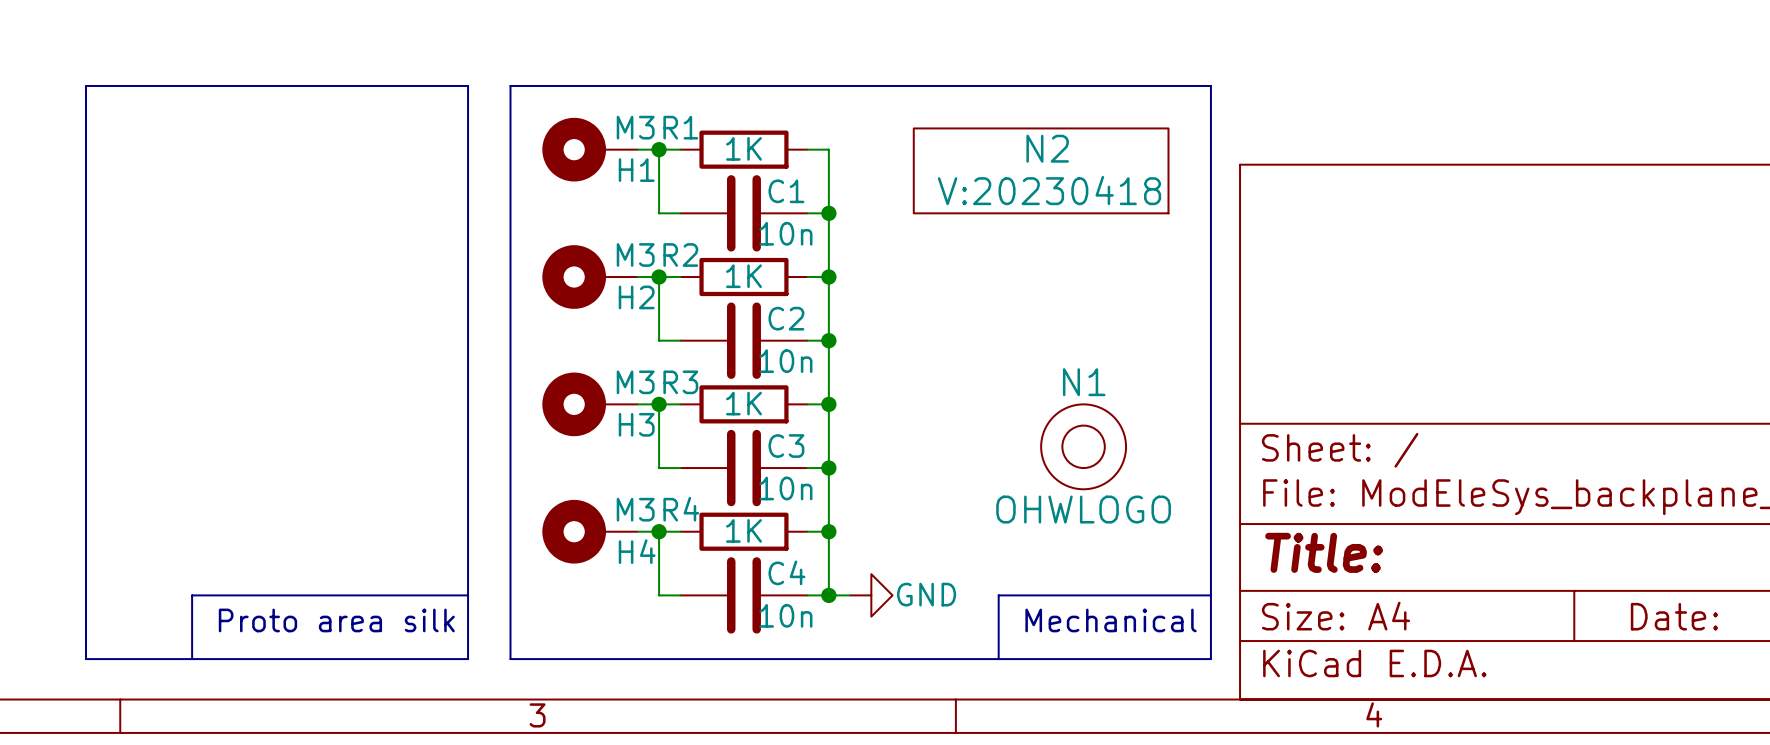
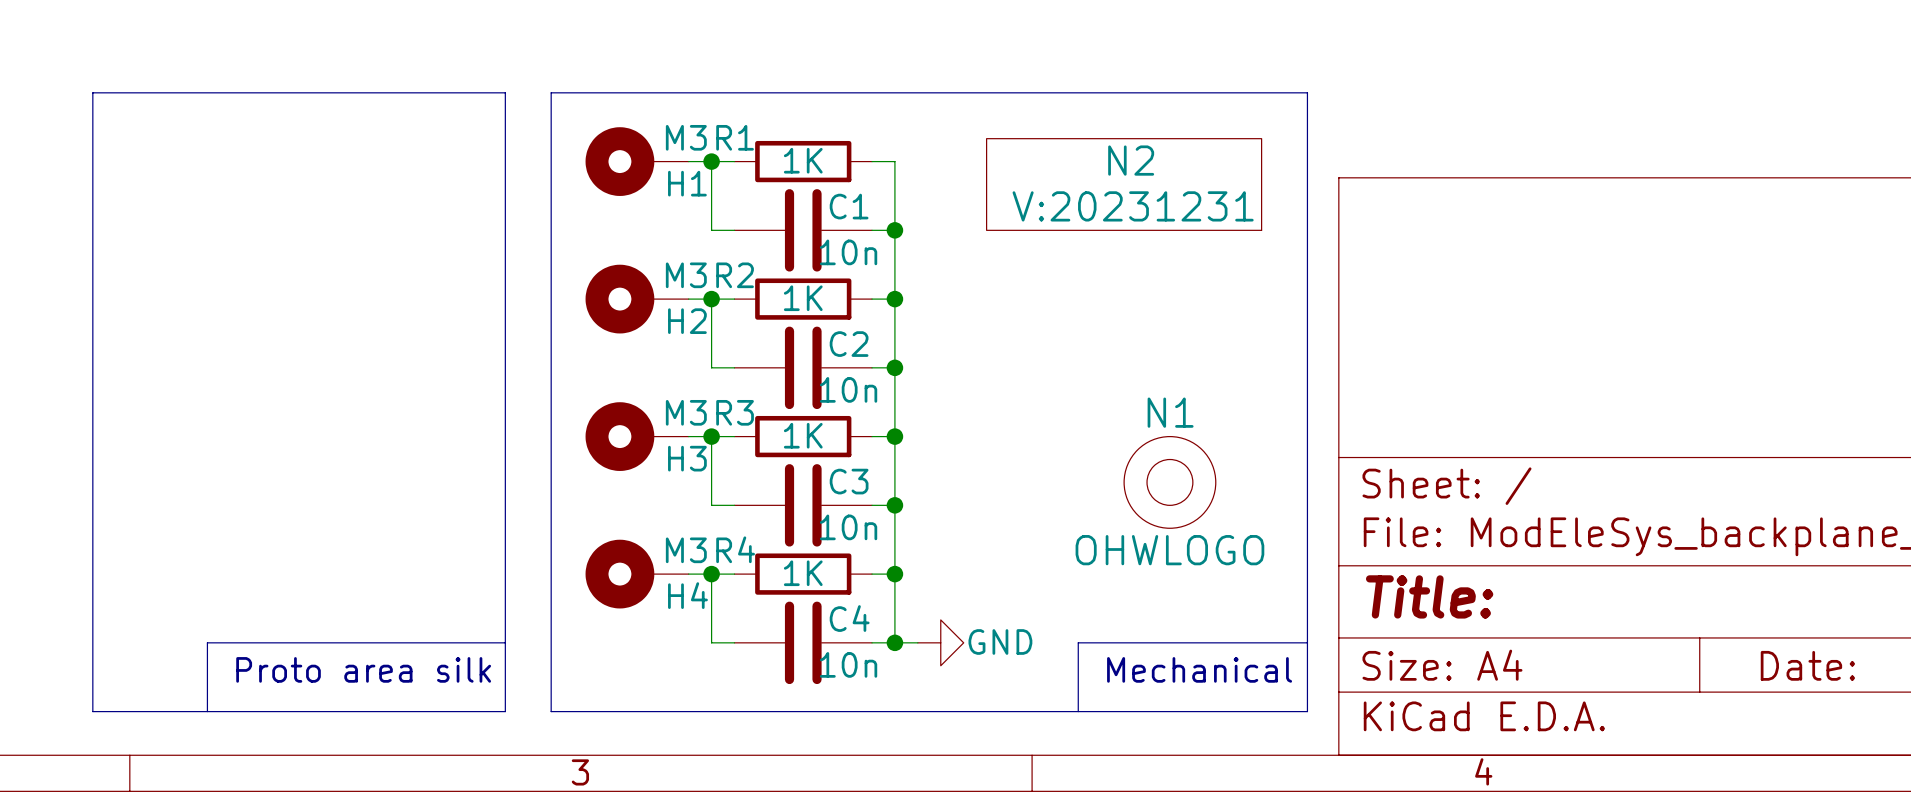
N2 value: V:20230418 (1049, 190) -> V:20231231 (1133, 206)

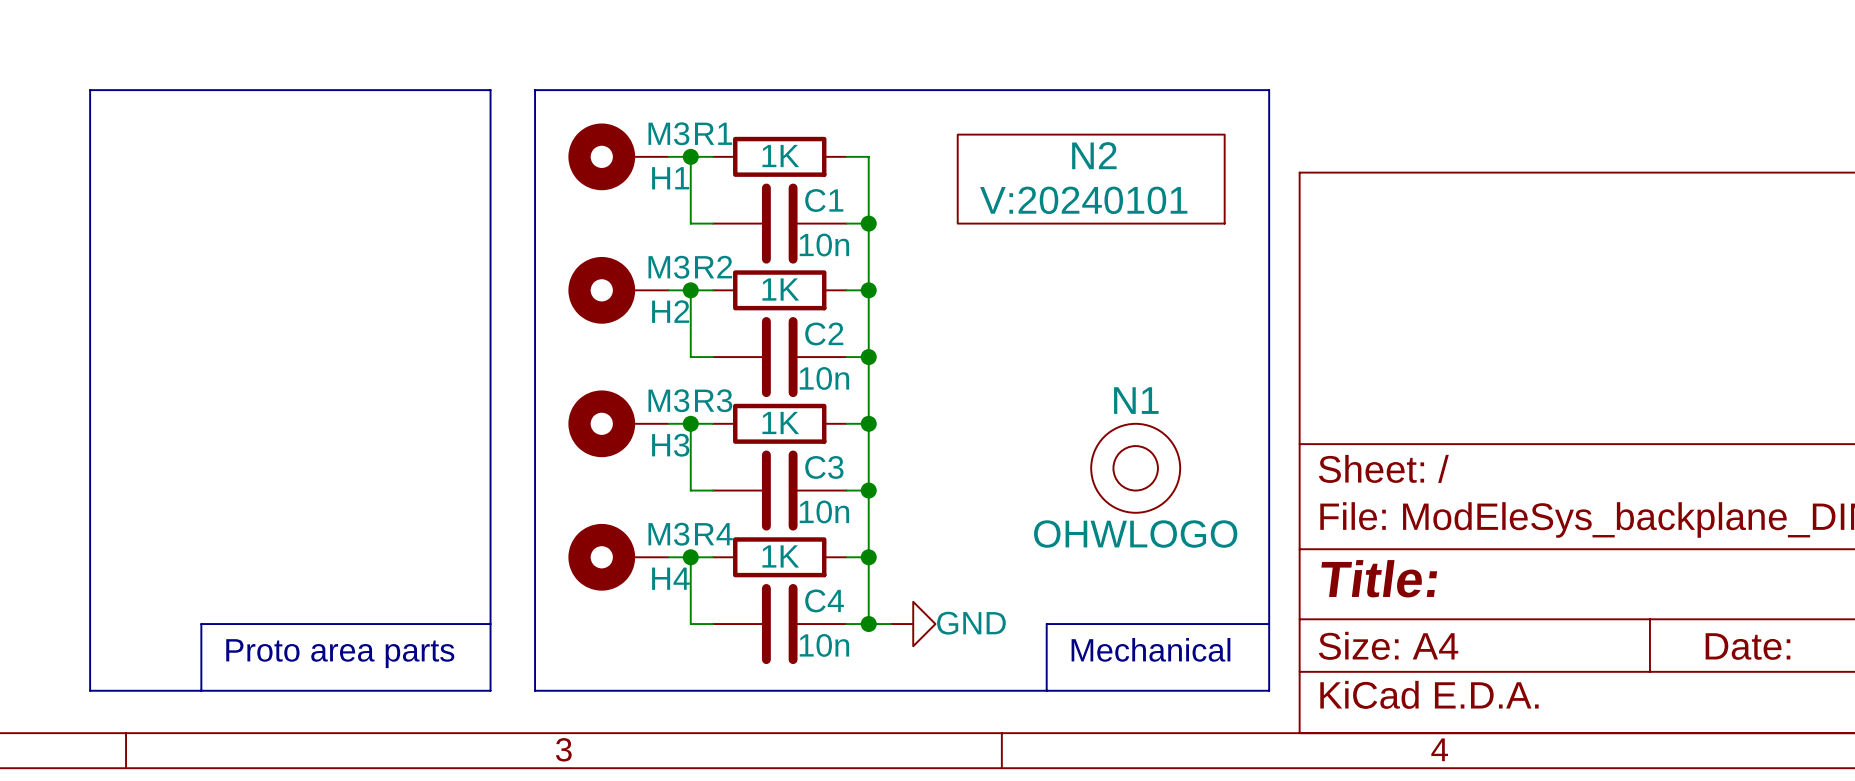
N2 value: V:20231231 (1133, 206) -> V:20240101 (1083, 200)
text: Proto area silk (363, 669) -> Proto area parts (340, 653)

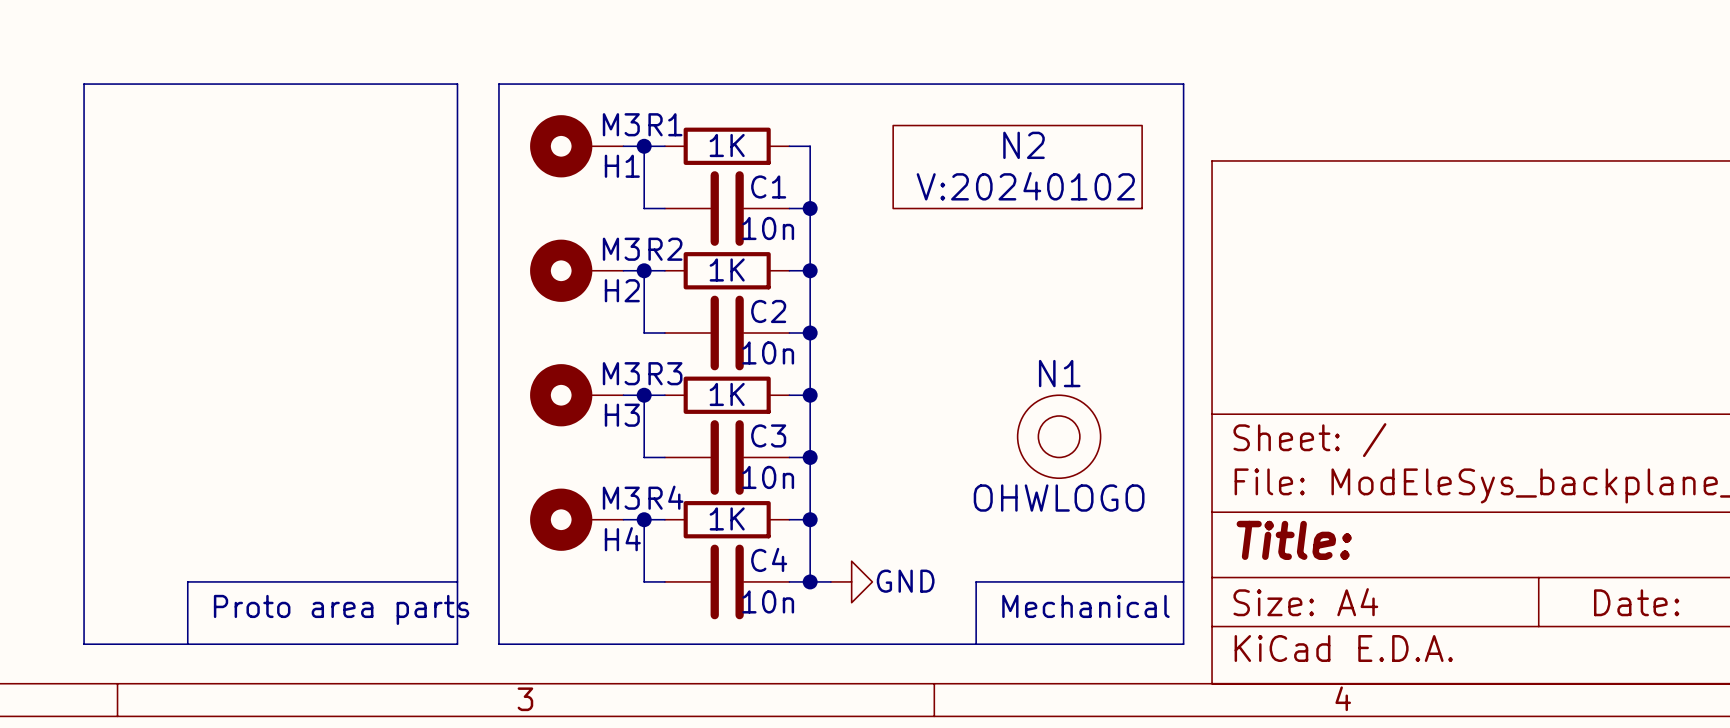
N2 value: V:20240101 (1083, 200) -> V:20240102 (1025, 186)

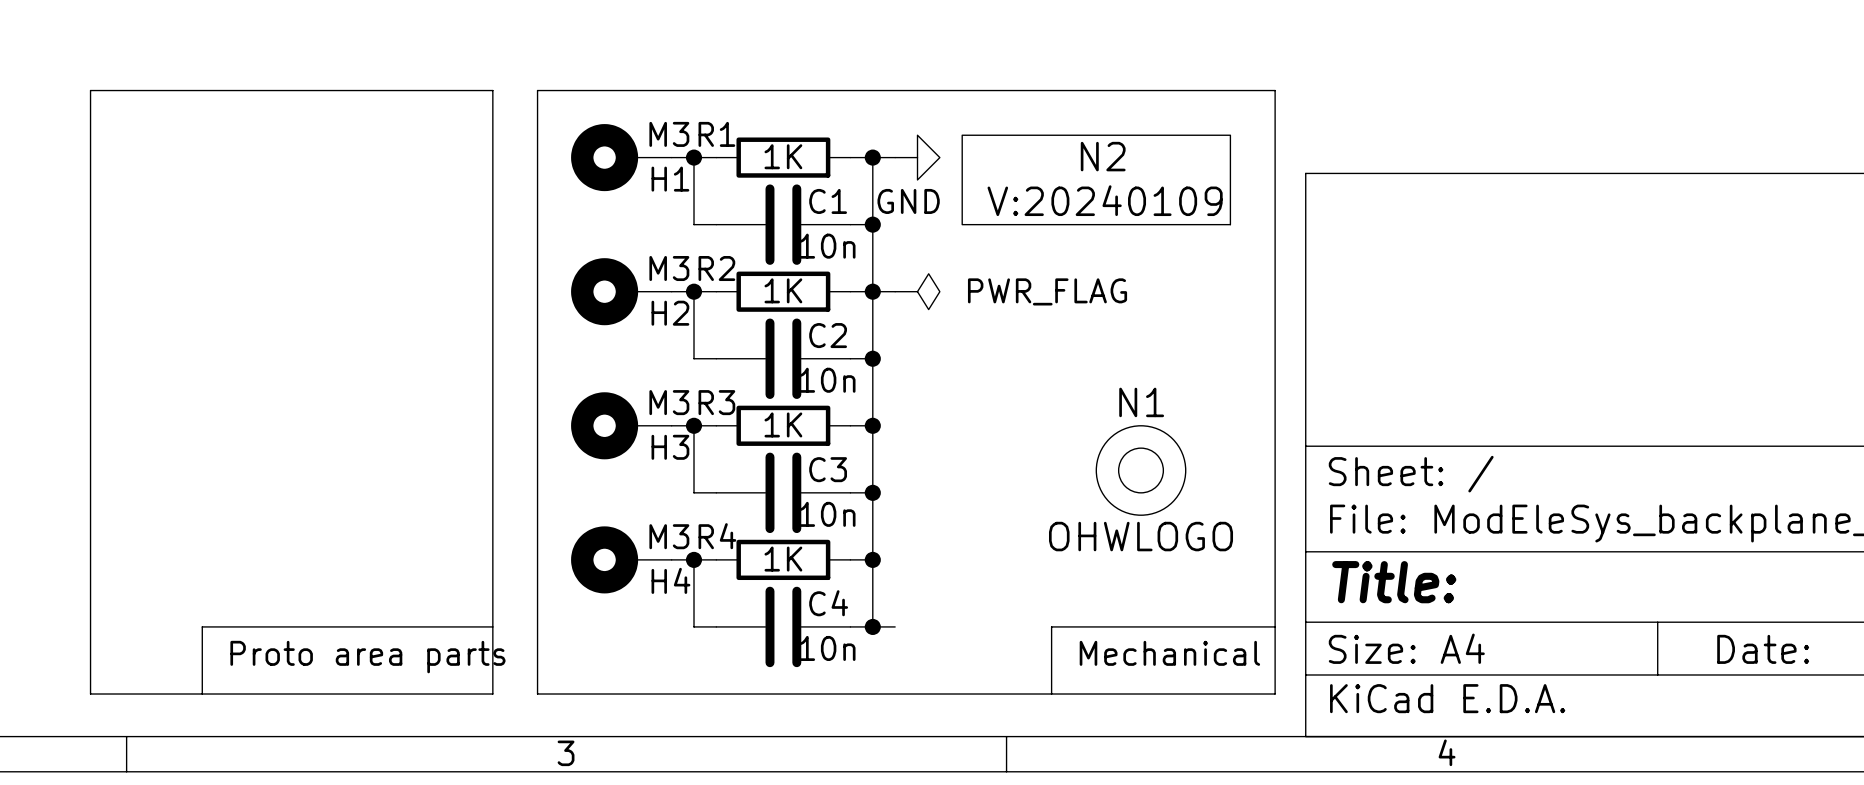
wire: none -> (872, 157) (895, 157)
junction: none -> (872, 157)
power symbol: none -> GND (917, 157)
N2 value: V:20240102 (1025, 186) -> V:20240109 (1105, 200)
wire: none -> (872, 291) (895, 291)
power symbol: none -> PWR_FLAG (917, 291)
power symbol: GND (851, 581) -> none

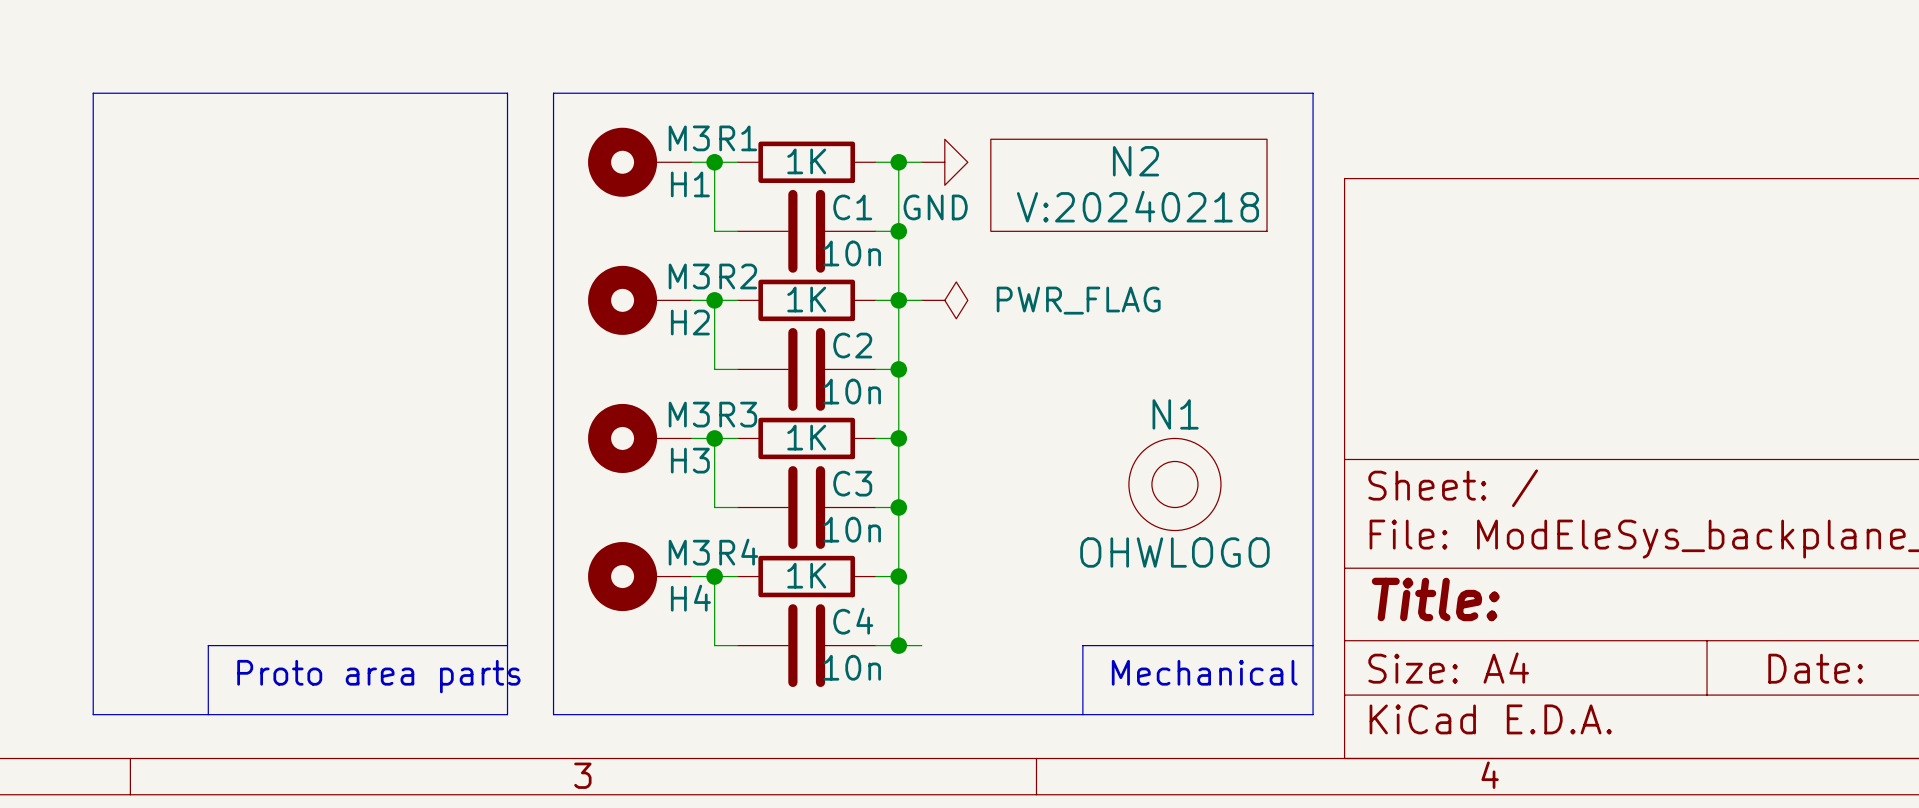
N2 value: V:20240109 (1105, 200) -> V:20240218 (1137, 206)

